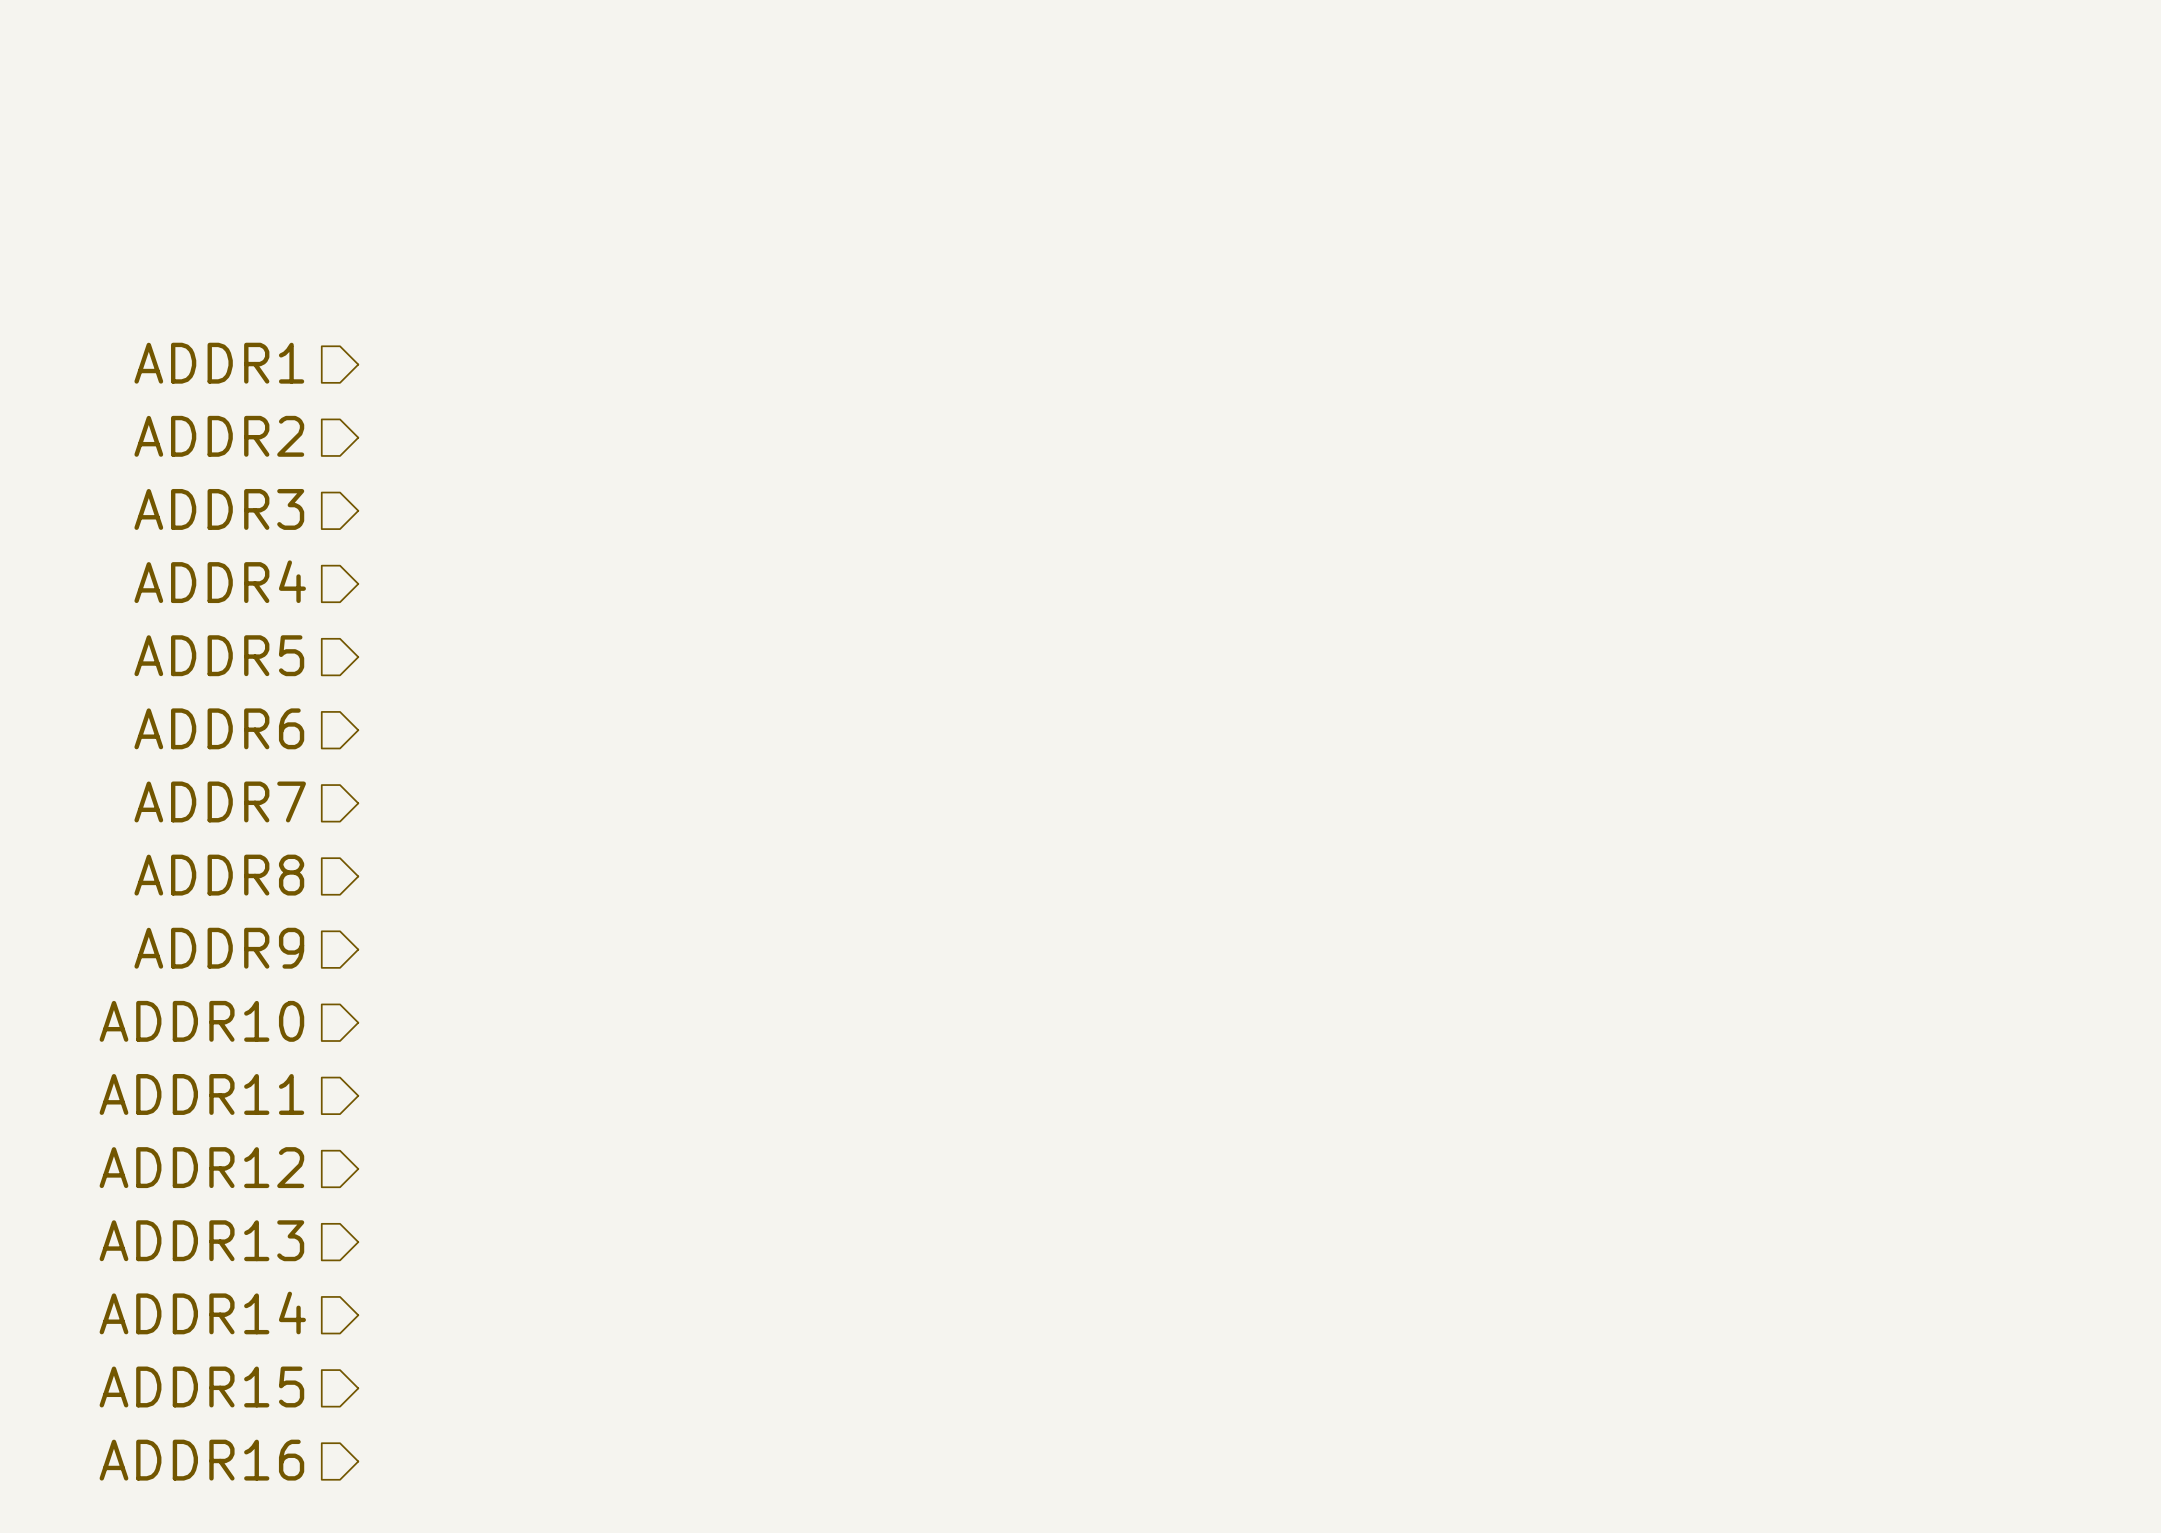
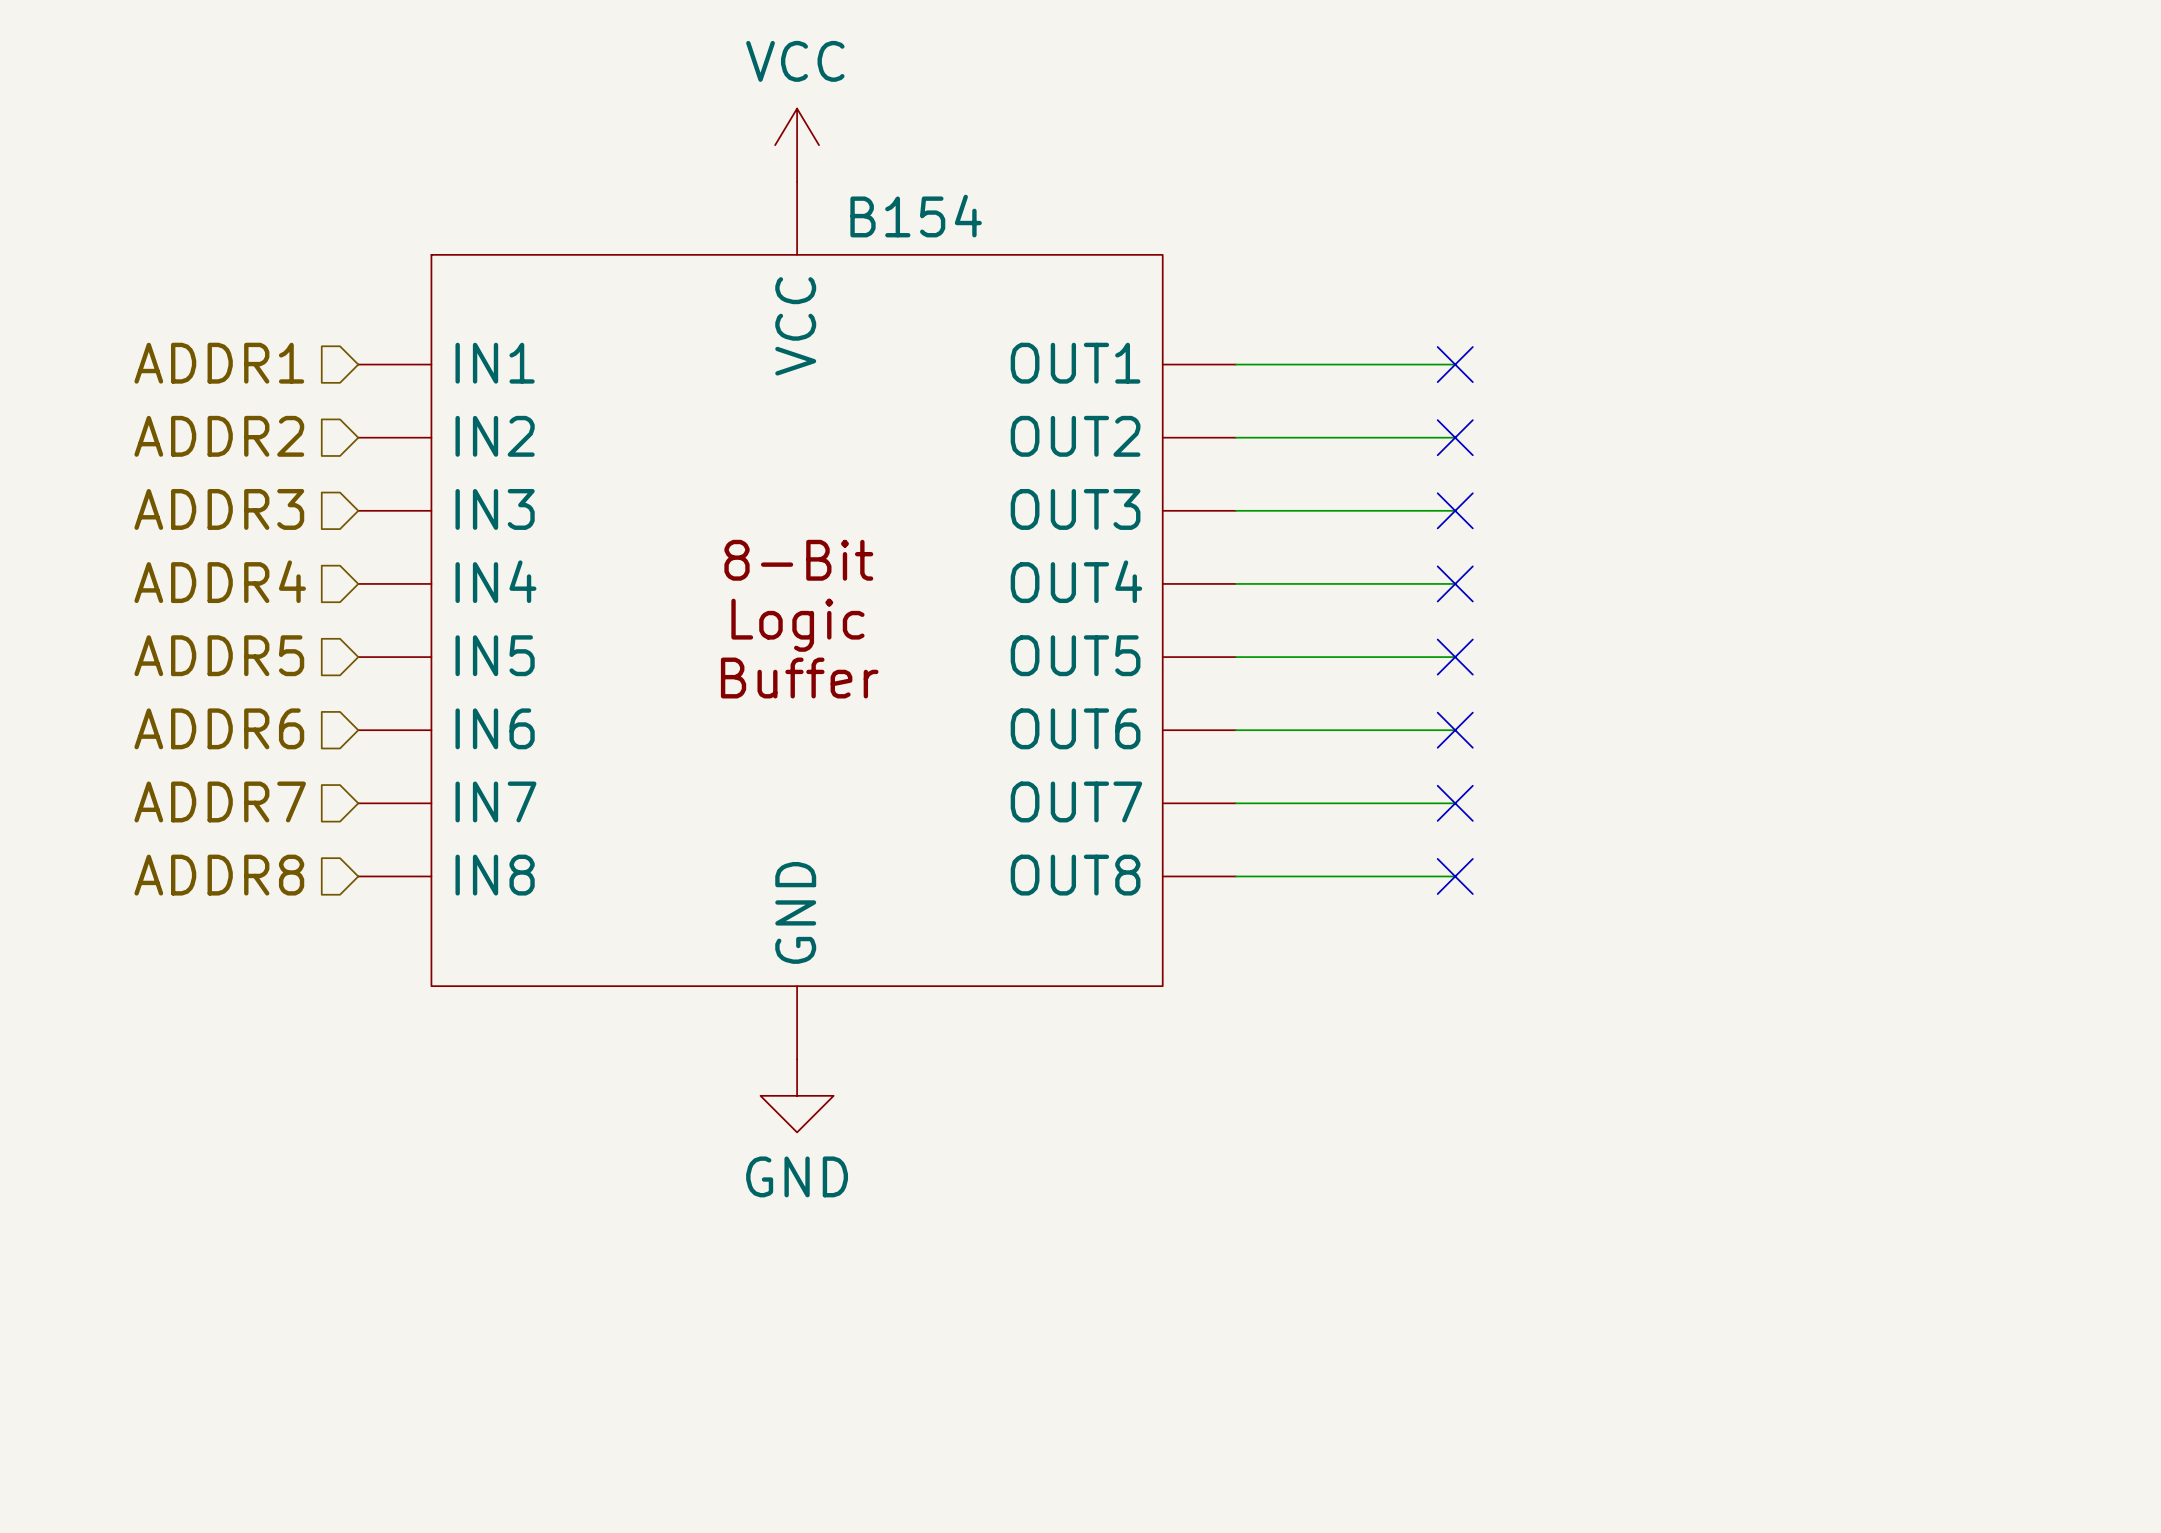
power symbol: none -> VCC (797, 145)
wire: none -> (1235, 364) (1455, 364)
no-connect mark: none -> (1455, 364)
wire: none -> (1235, 437) (1455, 437)
no-connect mark: none -> (1455, 437)
wire: none -> (1235, 510) (1455, 510)
no-connect mark: none -> (1455, 510)
wire: none -> (1235, 583) (1455, 583)
no-connect mark: none -> (1455, 583)
B154: none -> (797, 620)
wire: none -> (1235, 657) (1455, 657)
no-connect mark: none -> (1455, 657)
wire: none -> (1235, 730) (1455, 730)
no-connect mark: none -> (1455, 730)
wire: none -> (1235, 803) (1455, 803)
no-connect mark: none -> (1455, 803)
wire: none -> (1235, 876) (1455, 876)
no-connect mark: none -> (1455, 876)
hierarchical label: ADDR9 (219, 948) -> none
hierarchical label: ADDR10 (201, 1021) -> none
hierarchical label: ADDR11 (201, 1094) -> none
power symbol: none -> GND (797, 1095)
hierarchical label: ADDR12 (201, 1167) -> none
hierarchical label: ADDR13 (201, 1240) -> none
hierarchical label: ADDR14 (202, 1312) -> none
hierarchical label: ADDR15 (201, 1386) -> none
hierarchical label: ADDR16 (201, 1460) -> none

